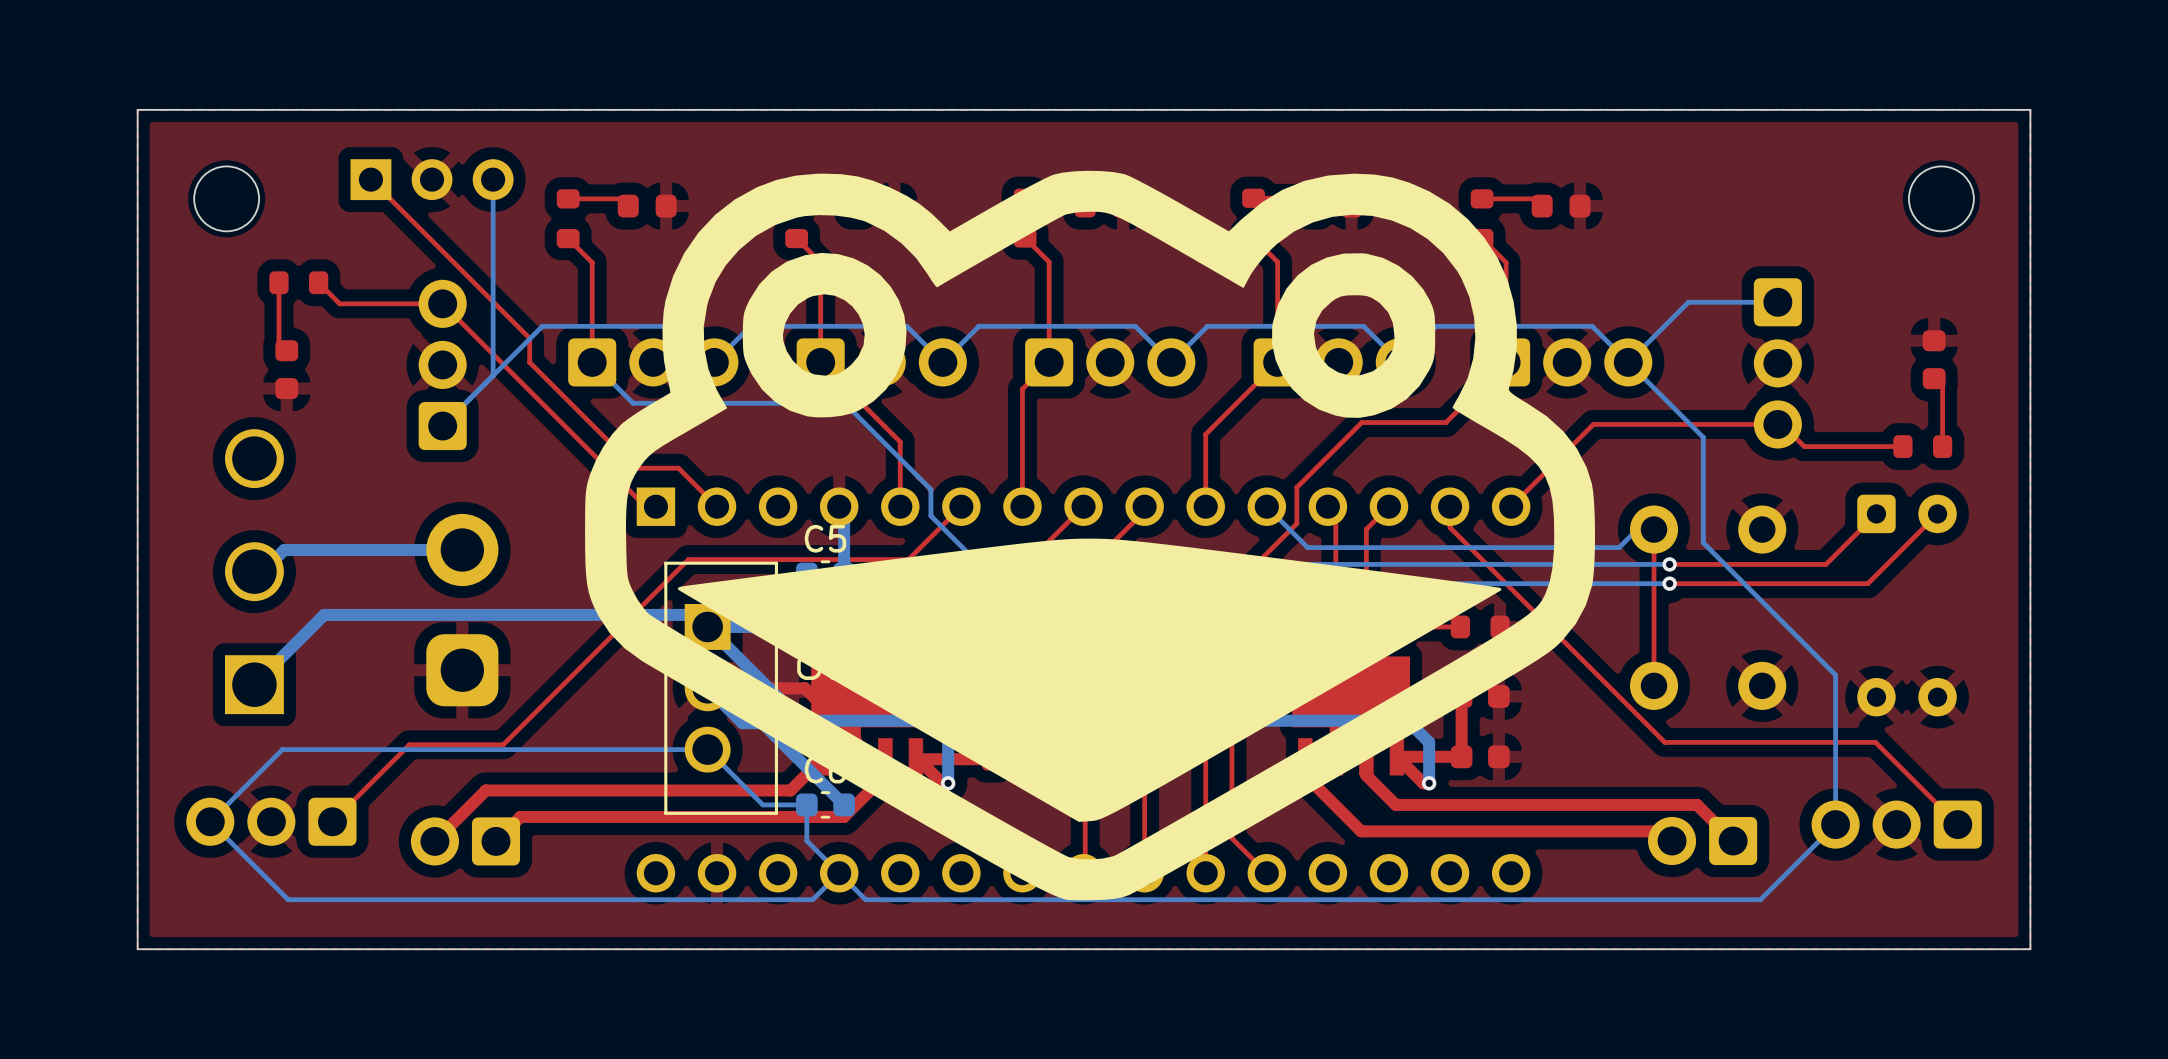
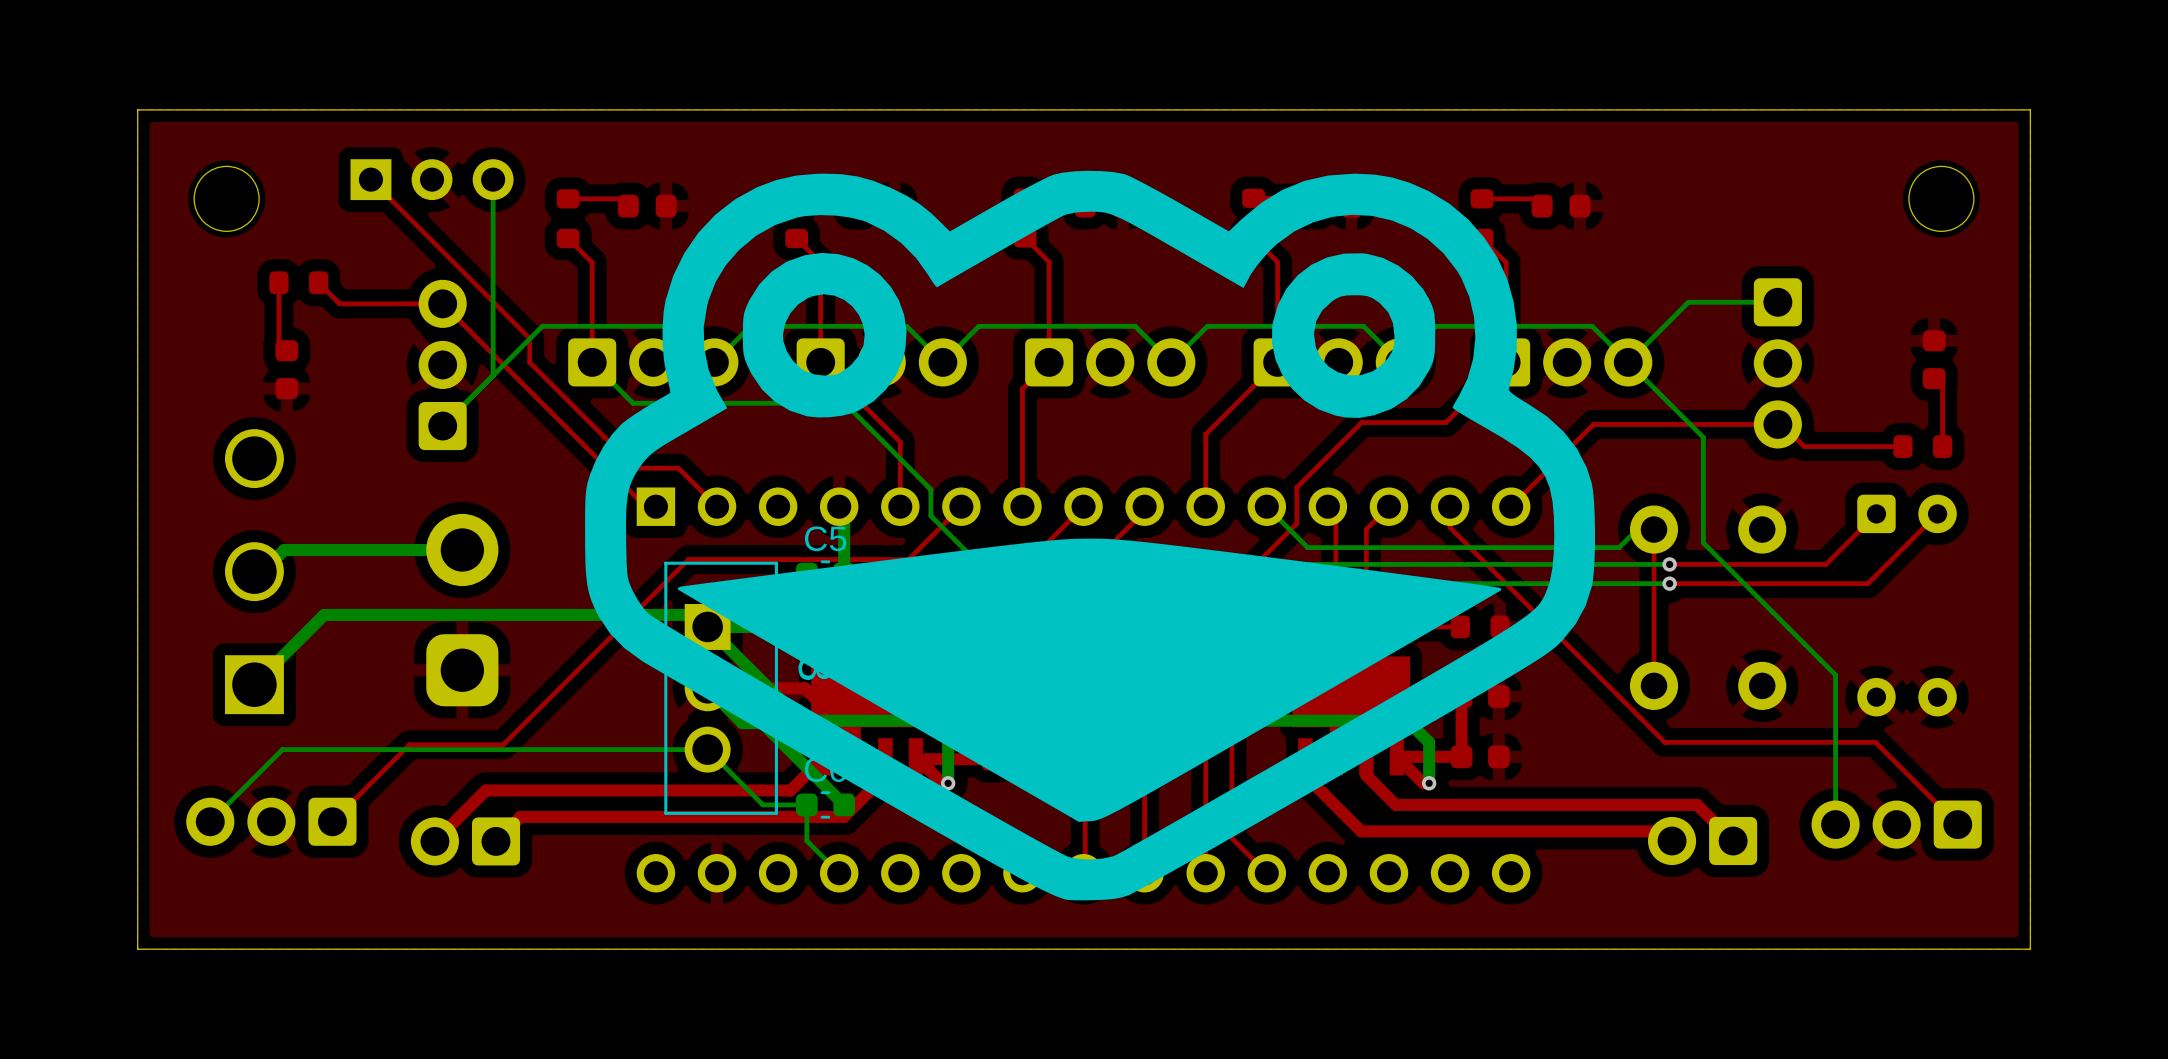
bottom track: (210, 821) (288, 899) (812, 899) (839, 873) (865, 899) (1760, 899) (1835, 824) -> none

